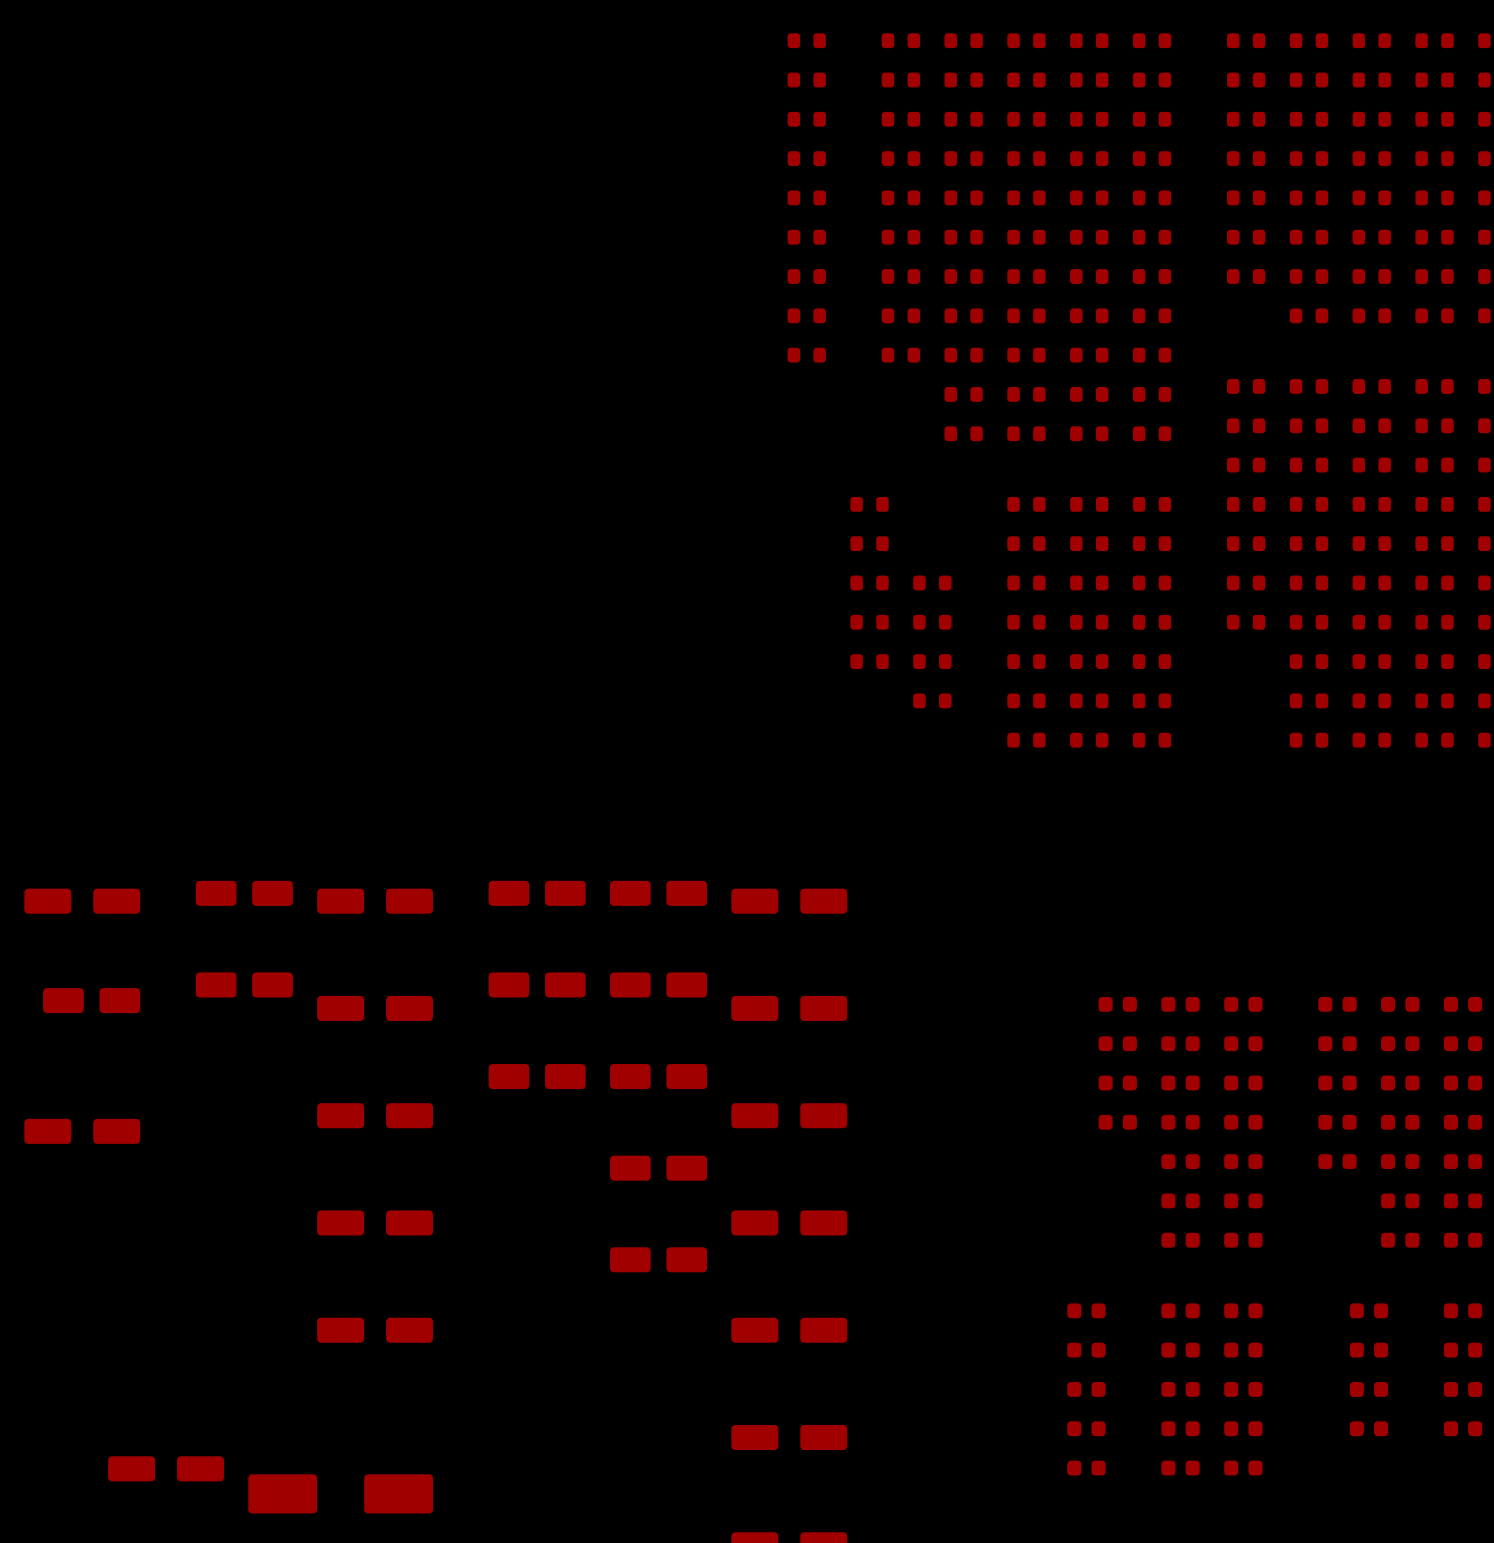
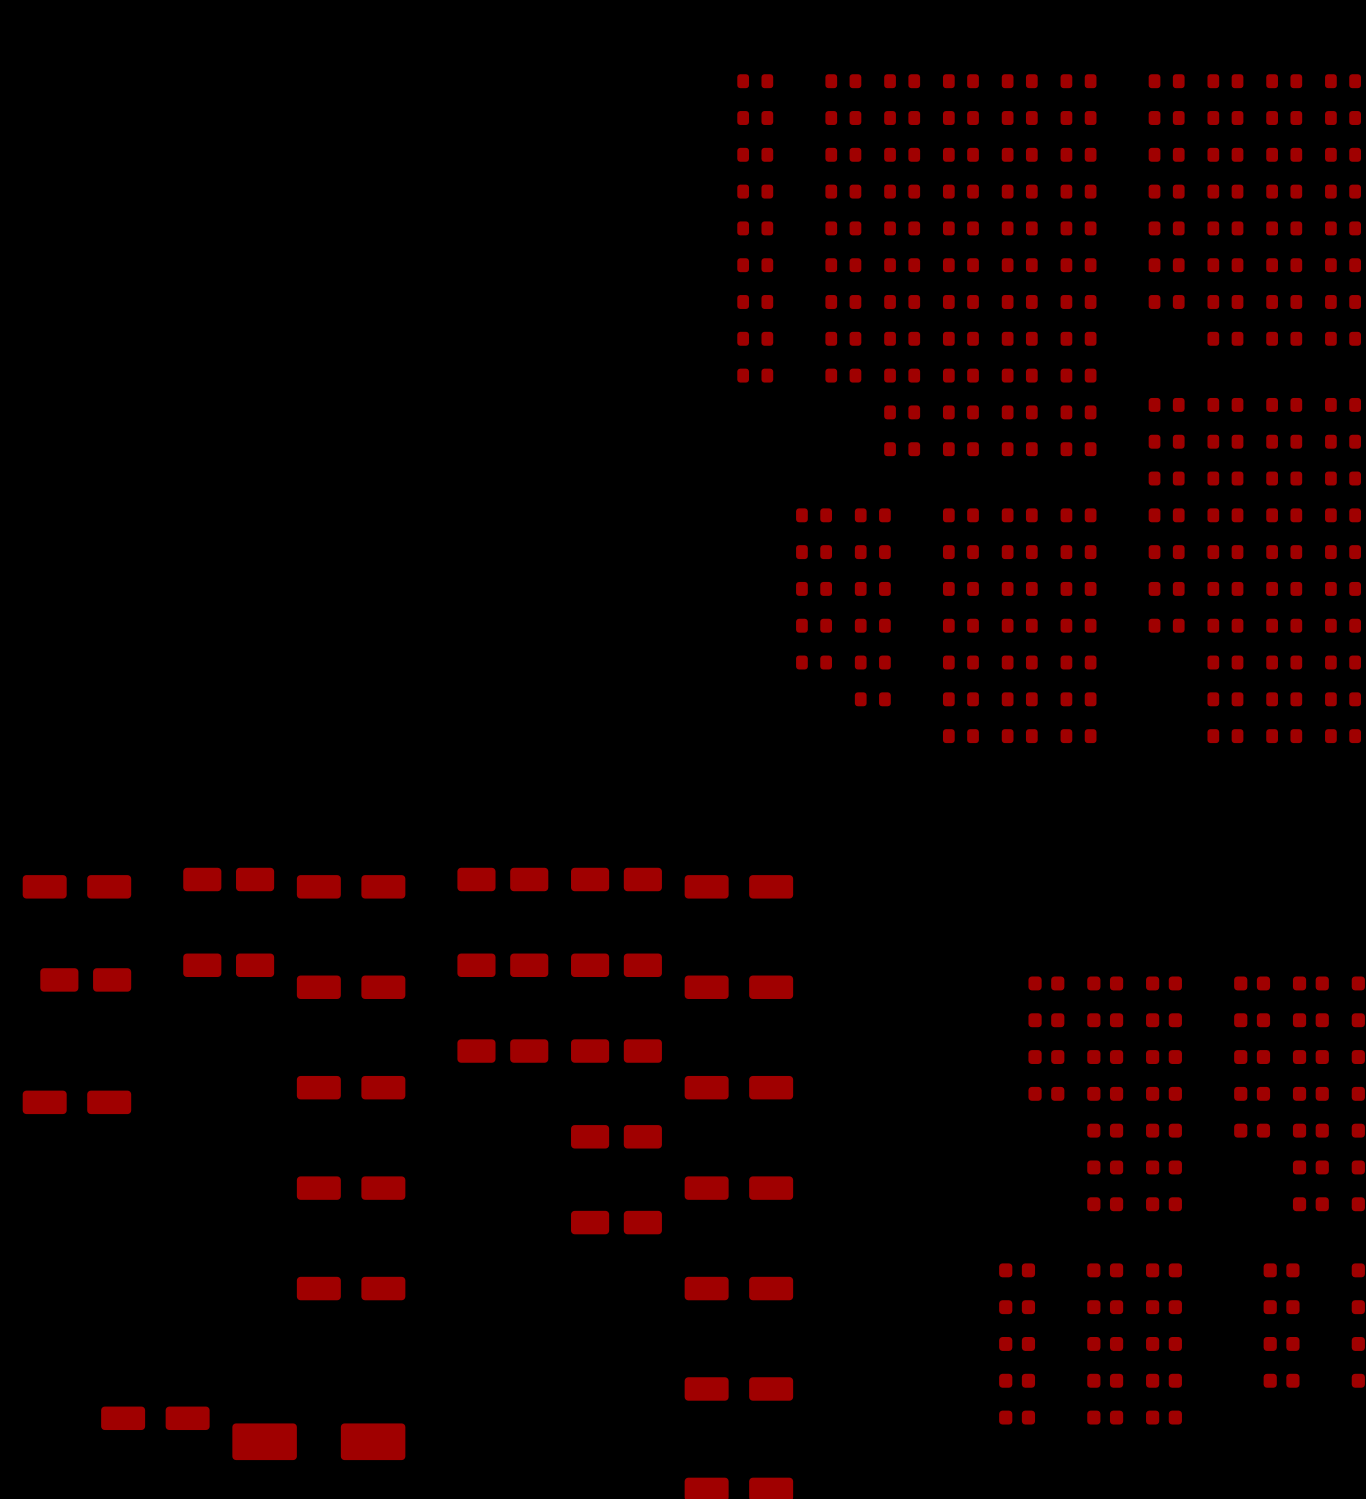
part: none -> (872, 515)
part: none -> (872, 552)

